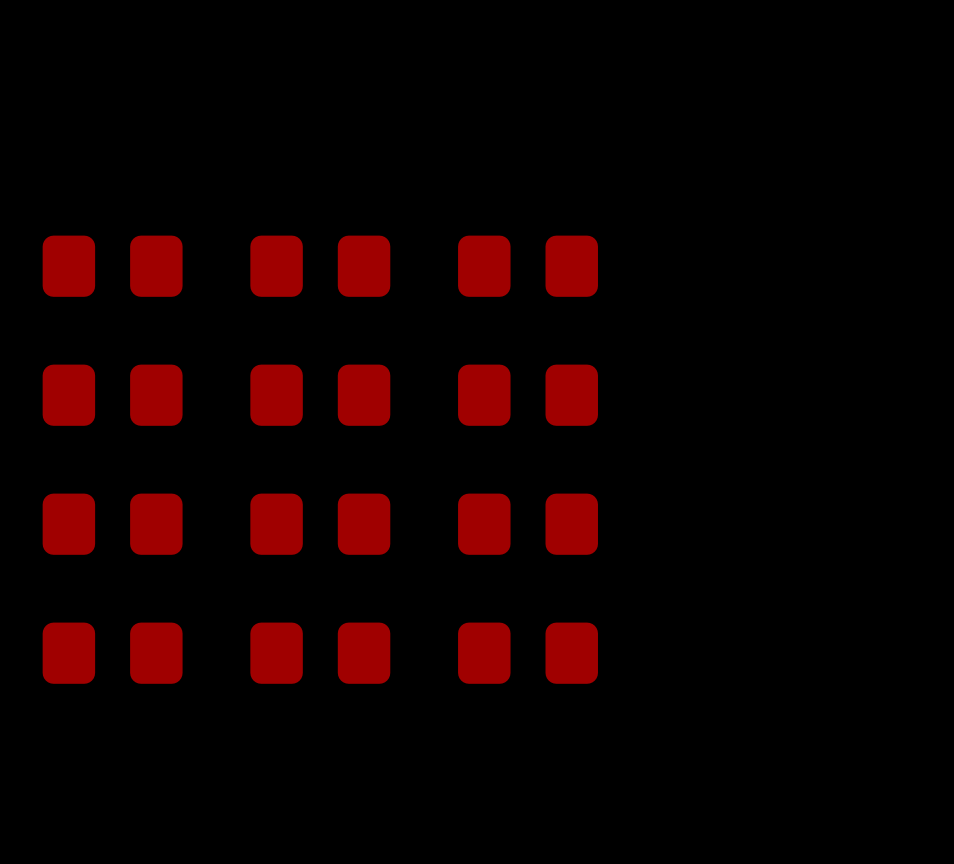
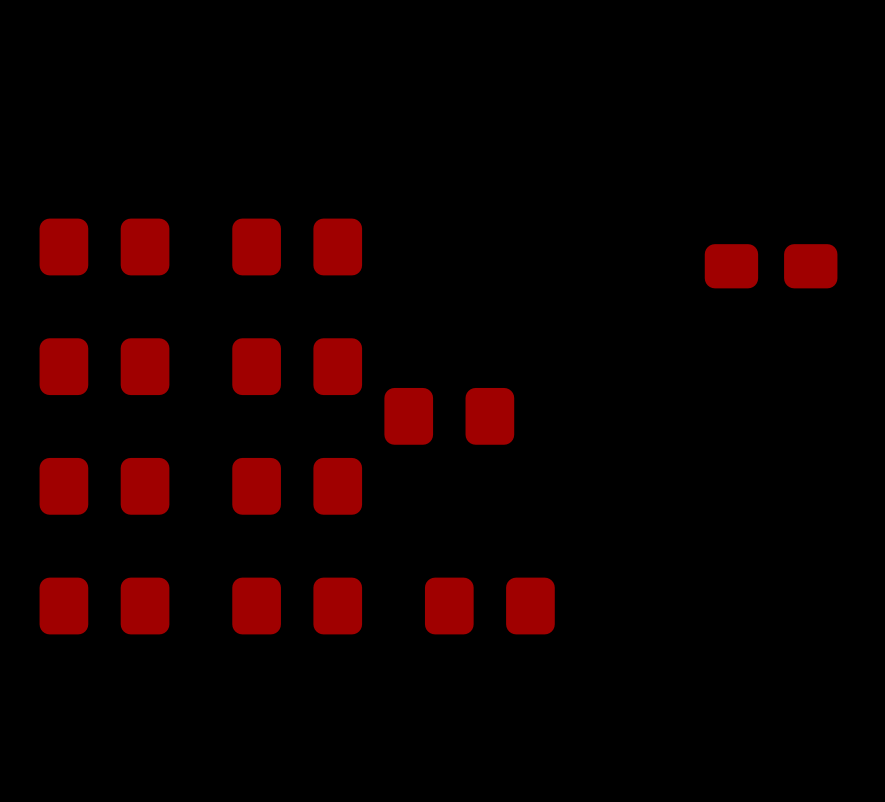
part: (528, 266) -> none
part: none -> (771, 266)
part: (528, 395) -> none
part: none -> (449, 416)
part: (528, 524) -> none

